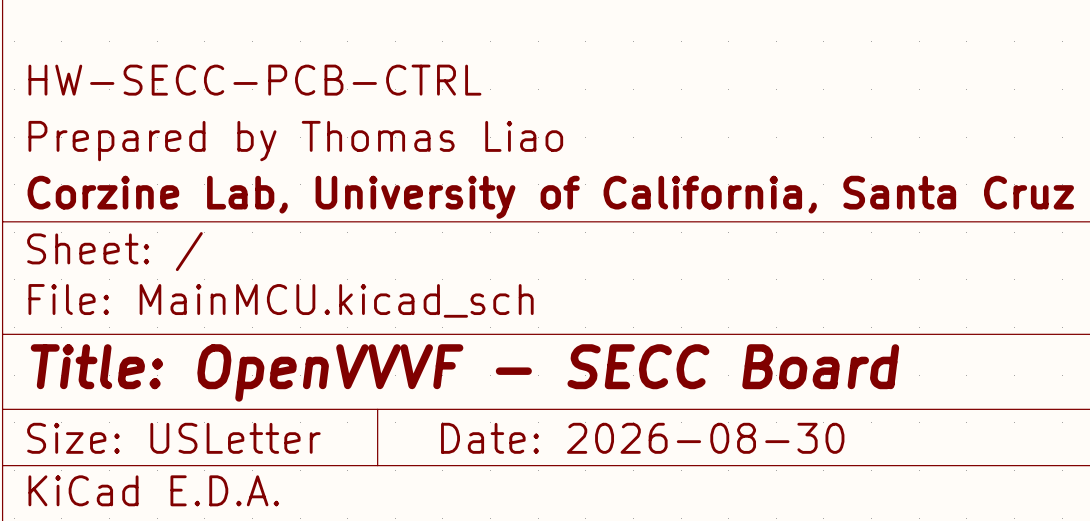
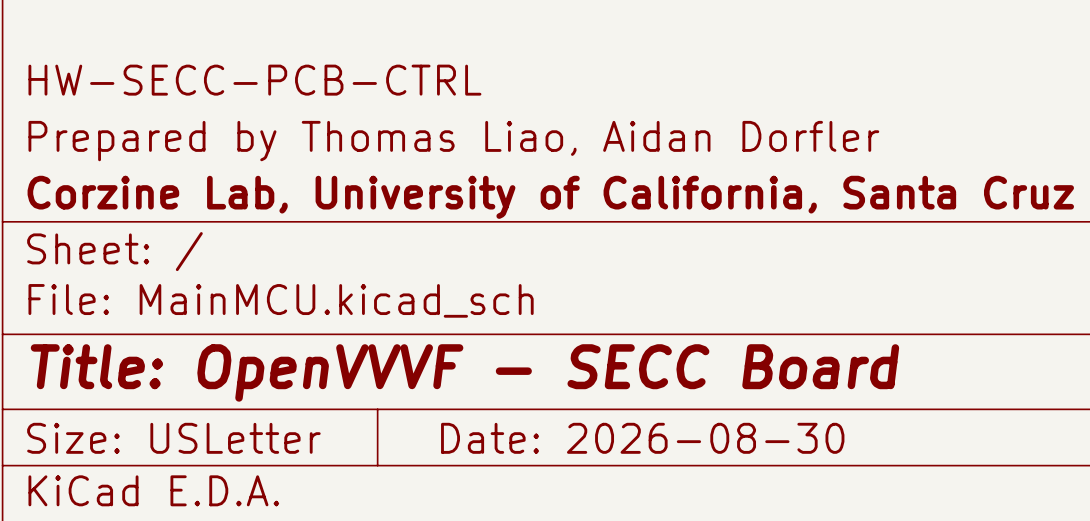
title block: Prepared by Thomas Liao (295, 141) -> Prepared by Thomas Liao, Aidan Dorfler (453, 141)

